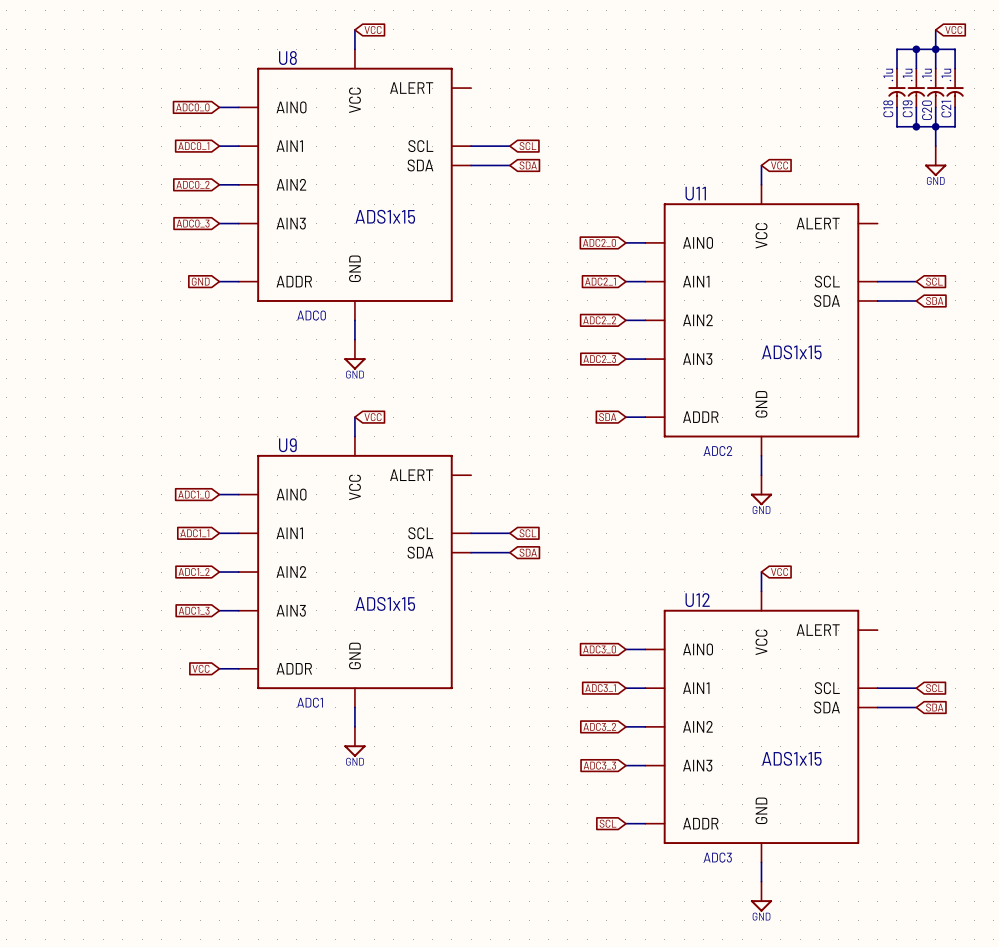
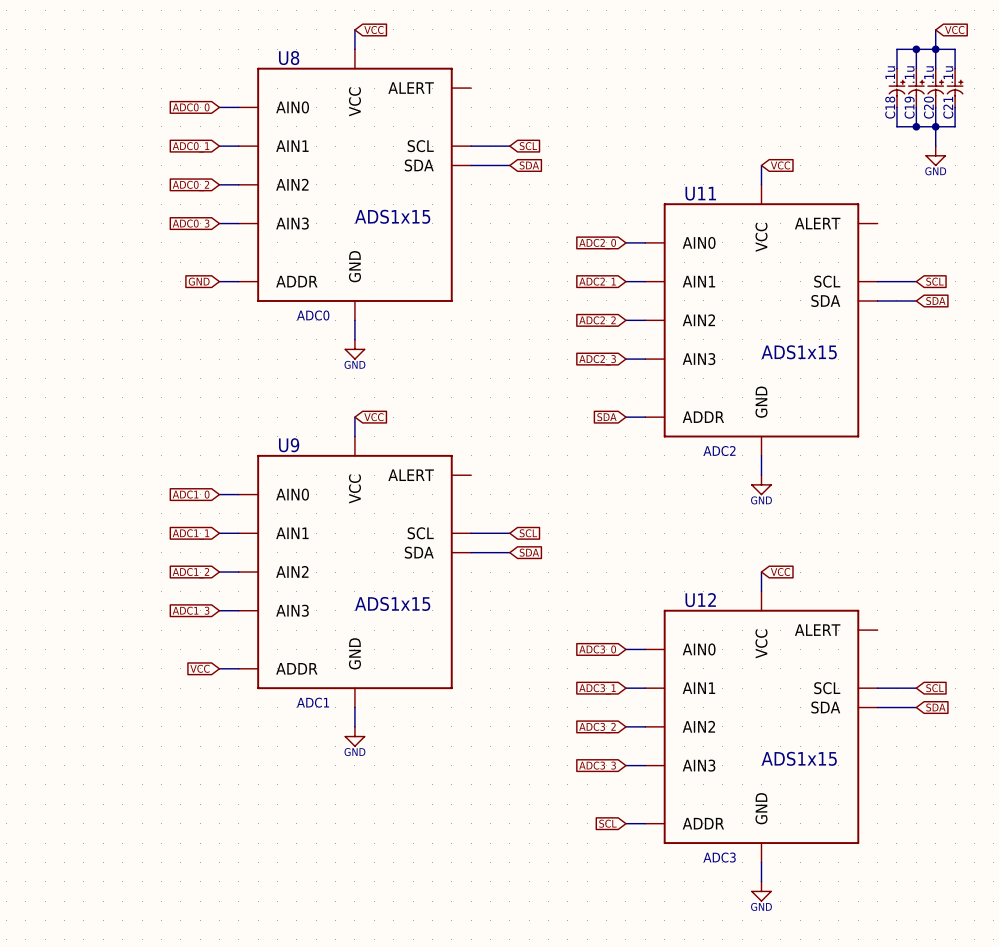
C18 symbol: [888, 68, 906, 108] -> [888, 68, 906, 108]
C19 symbol: [907, 68, 926, 108] -> [908, 68, 925, 108]
C20 symbol: [927, 68, 945, 108] -> [927, 68, 945, 108]
C21 symbol: [946, 68, 964, 108] -> [946, 68, 964, 108]
power symbol shape: [925, 146, 947, 177] -> [925, 145, 946, 167]
power symbol shape: [344, 339, 366, 370] -> [344, 339, 366, 360]
power symbol shape: [750, 475, 773, 506] -> [751, 474, 772, 496]
power symbol shape: [344, 726, 366, 757] -> [344, 726, 366, 747]
power symbol shape: [750, 881, 773, 912] -> [751, 881, 772, 902]

